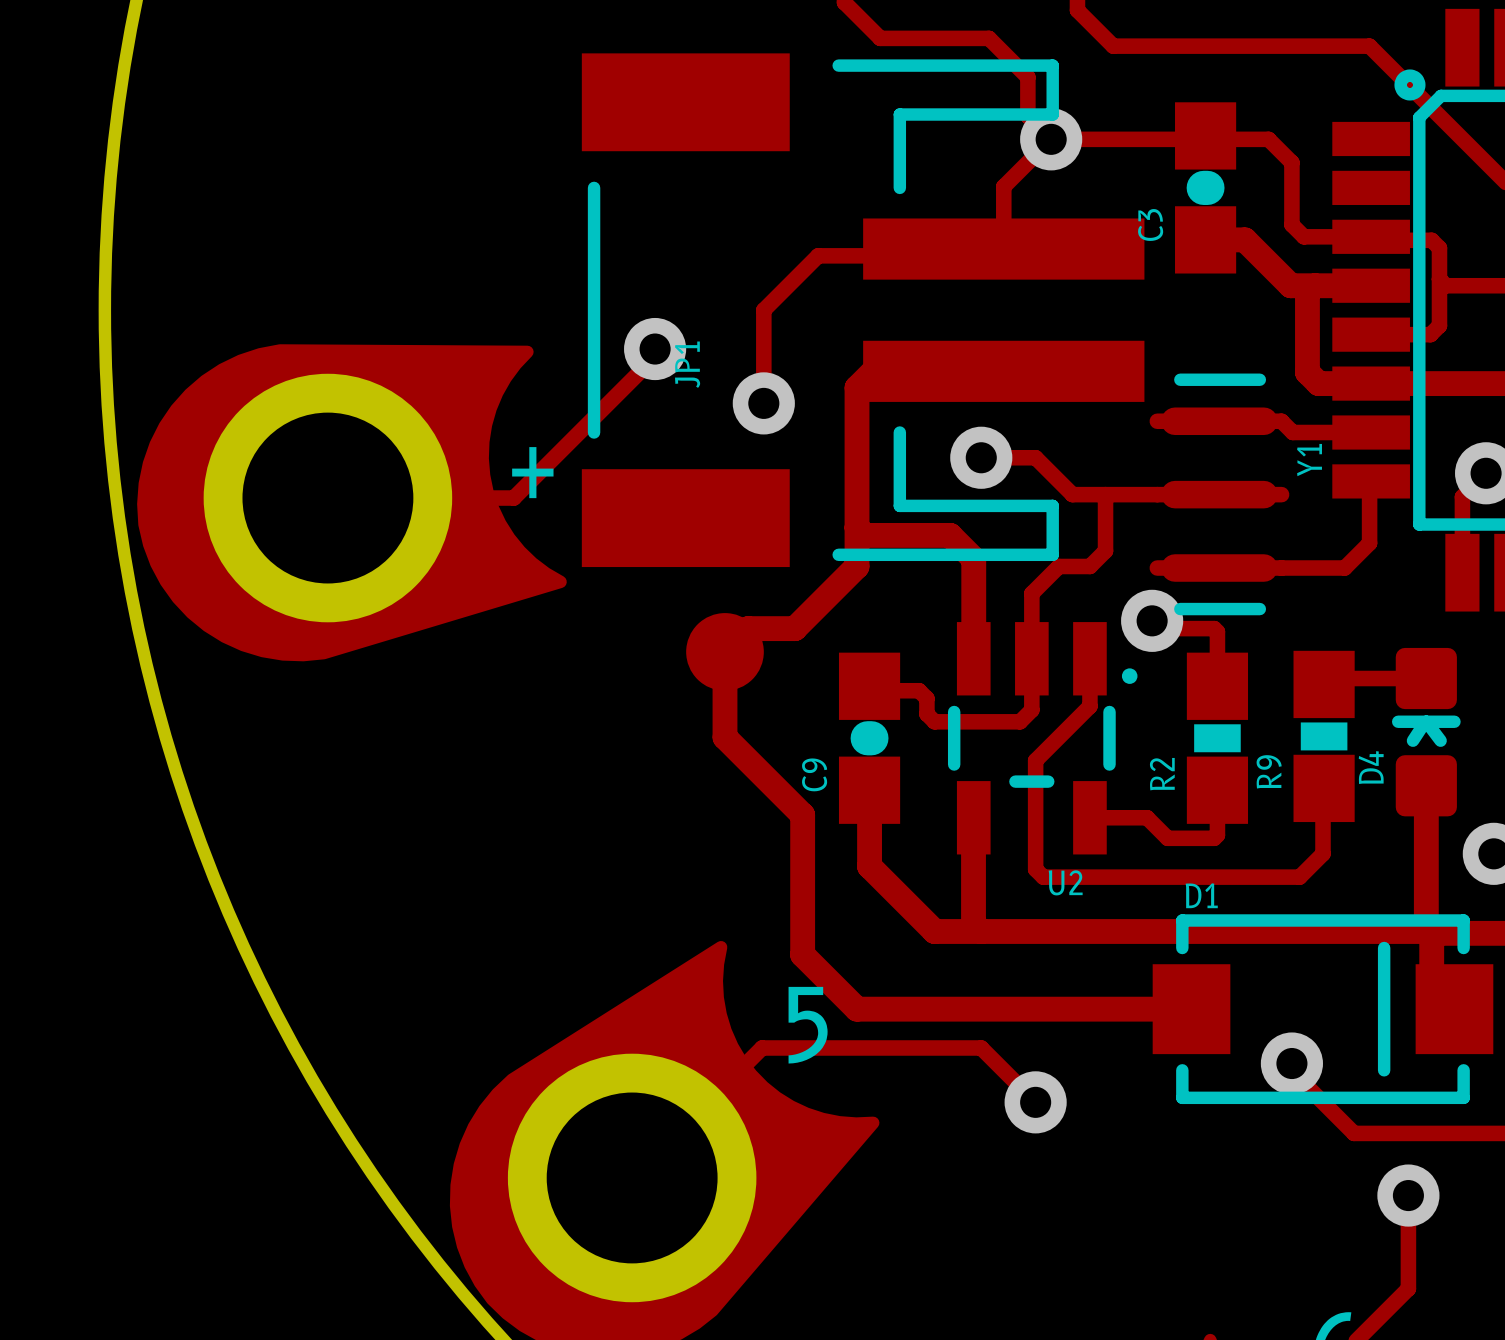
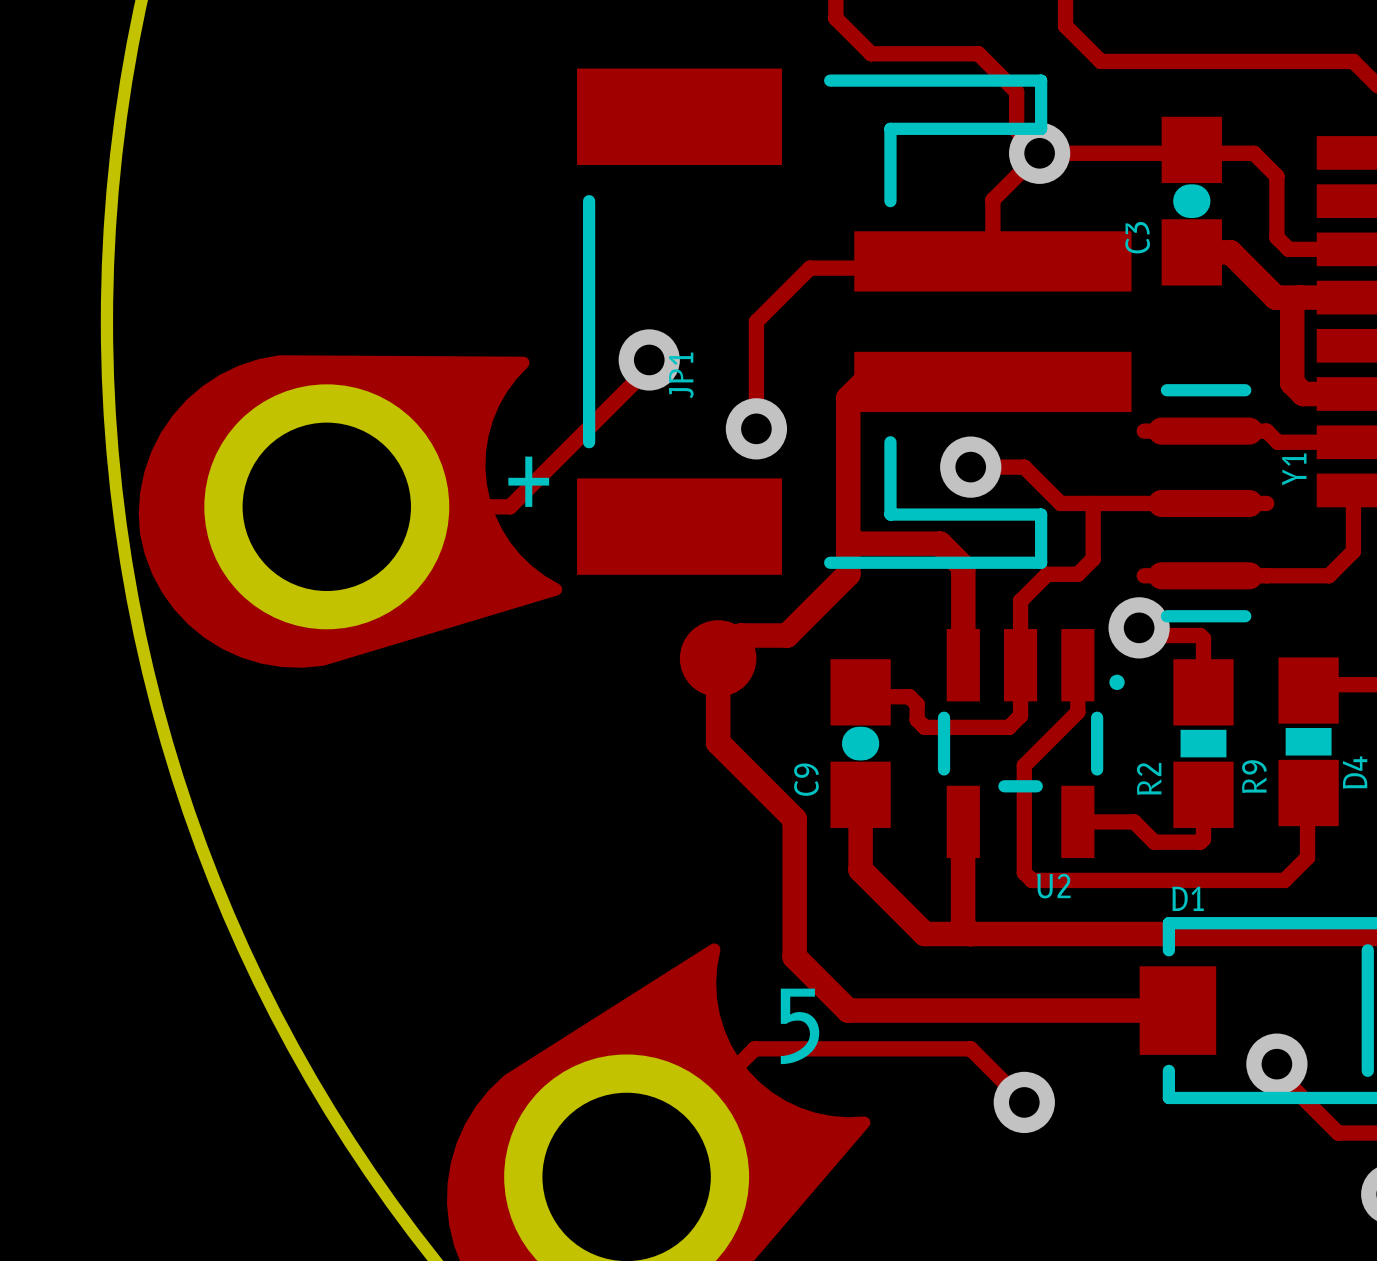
via position: (763, 403) -> (756, 428)

